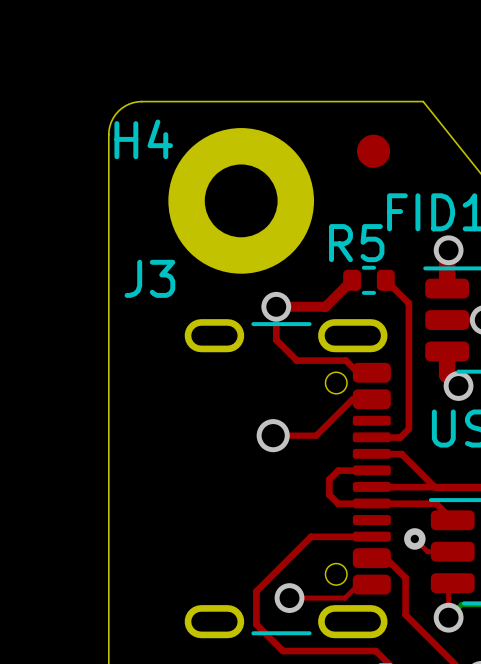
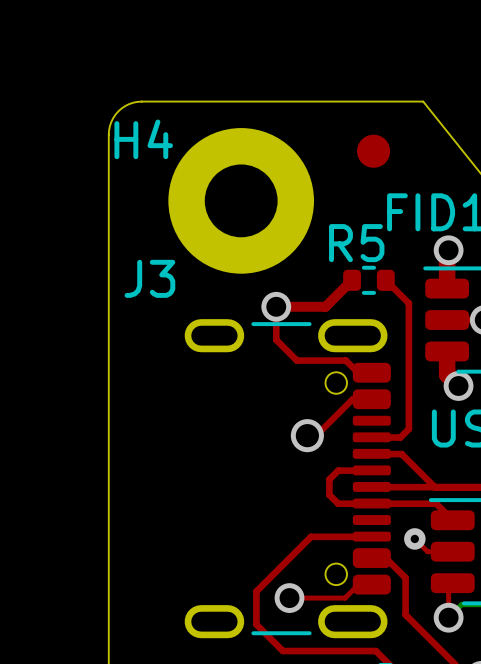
top track: (273, 435) (307, 435) -> none
via position: (273, 435) -> (307, 435)

